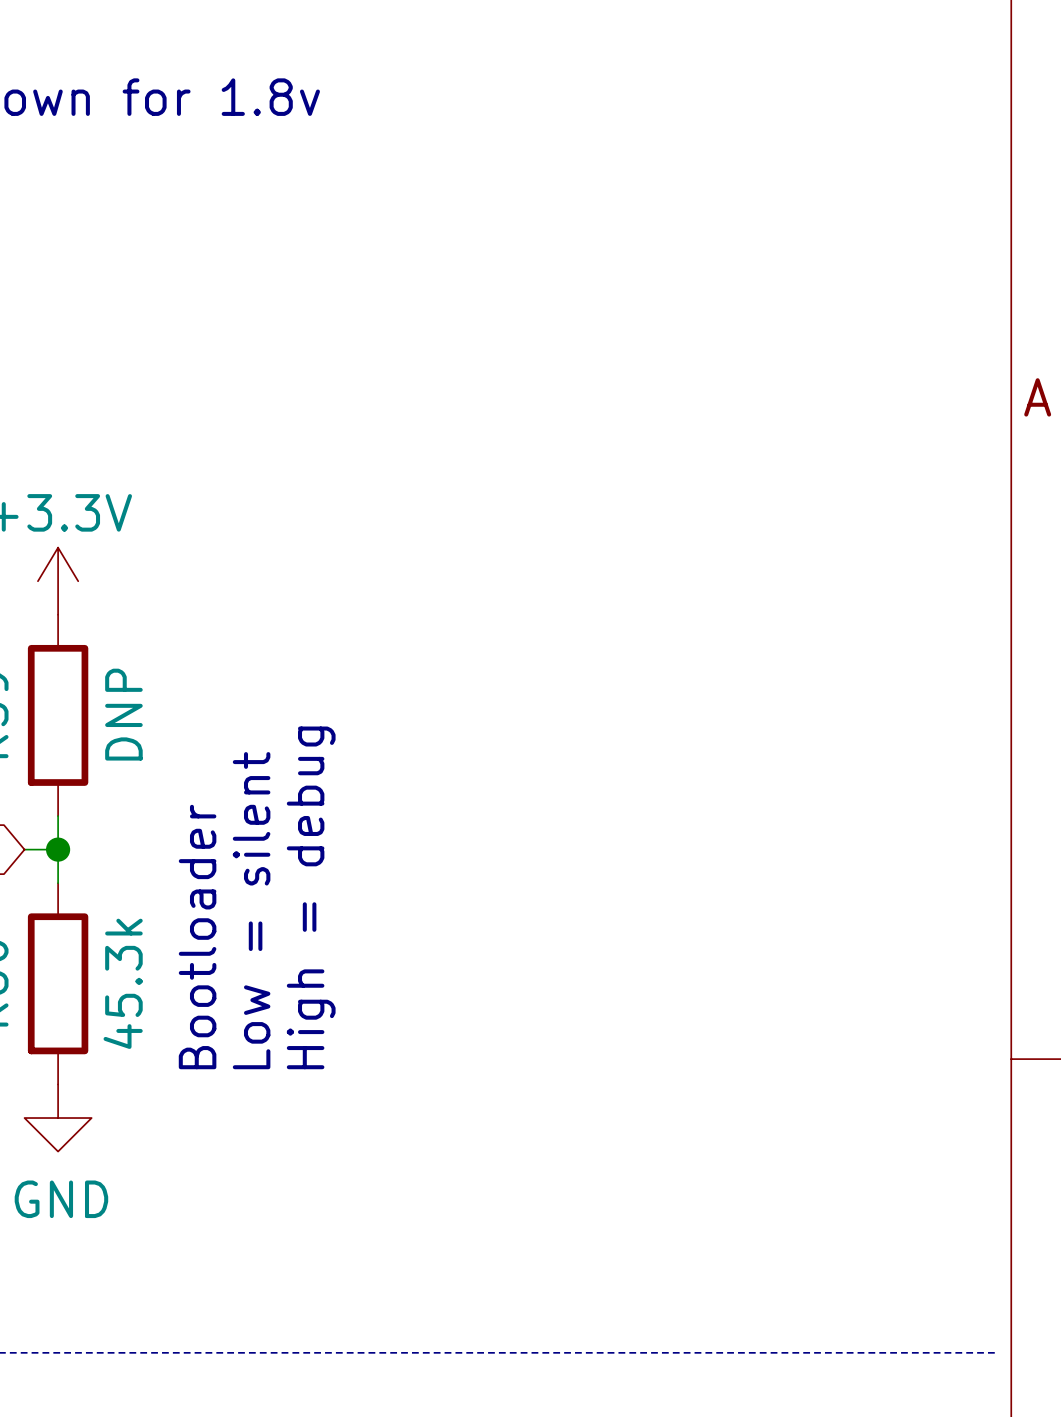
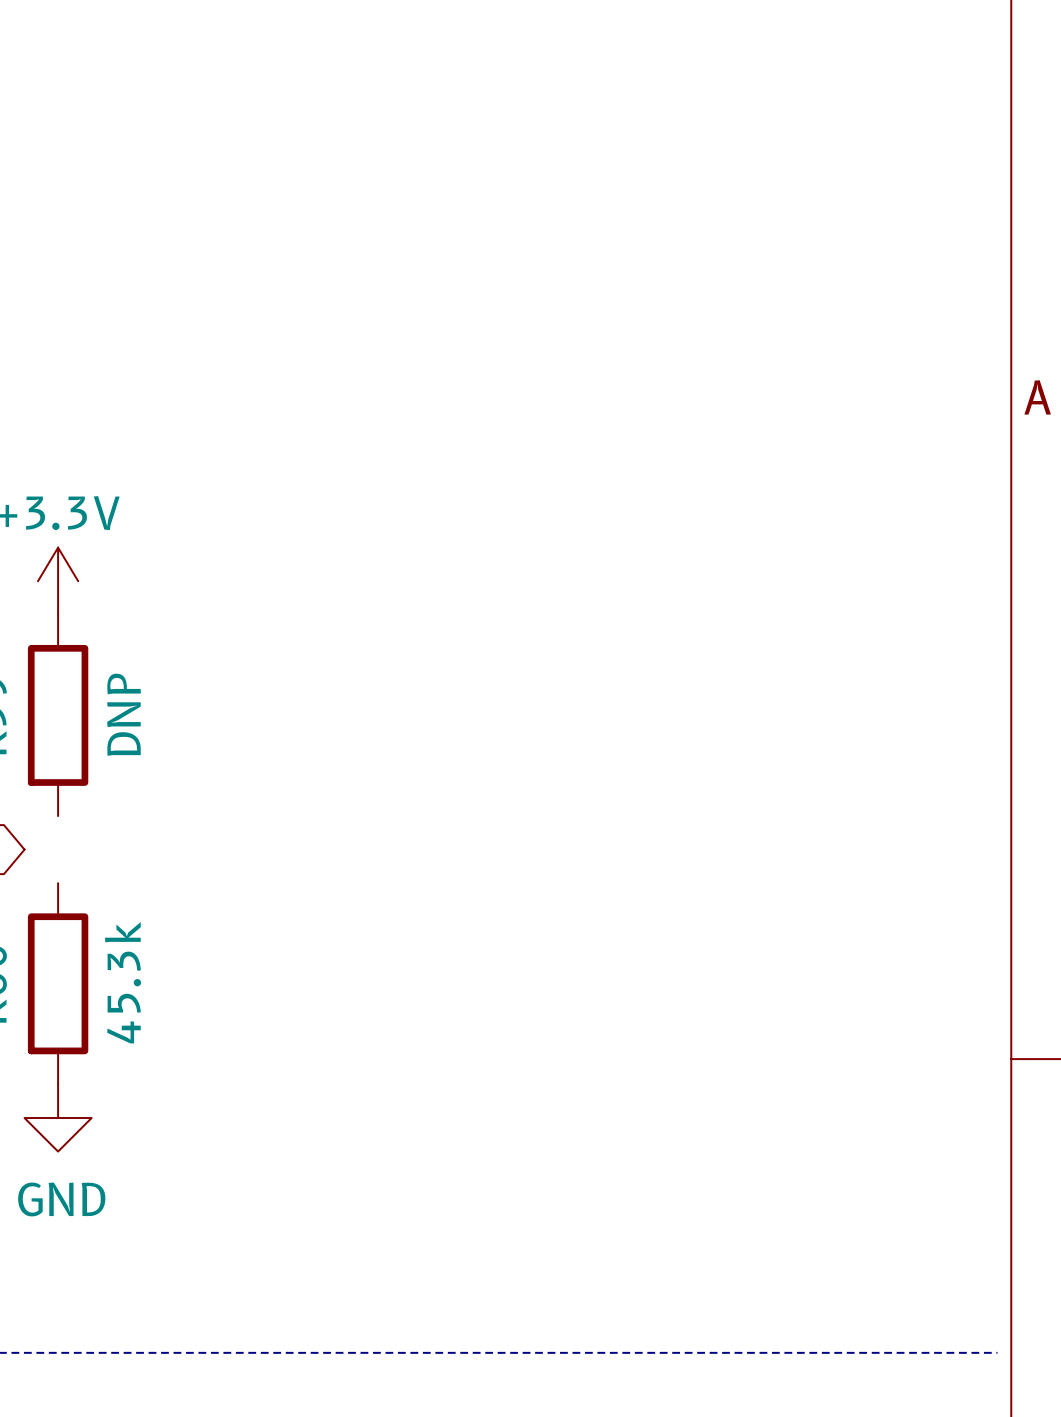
wire: (58, 816) (58, 883) -> none
wire: (24, 849) (58, 849) -> none
junction: (58, 849) -> none
text: High = debug (311, 897) -> none
text: Low = silent (251, 910) -> none
text: Bootloader (197, 937) -> none

